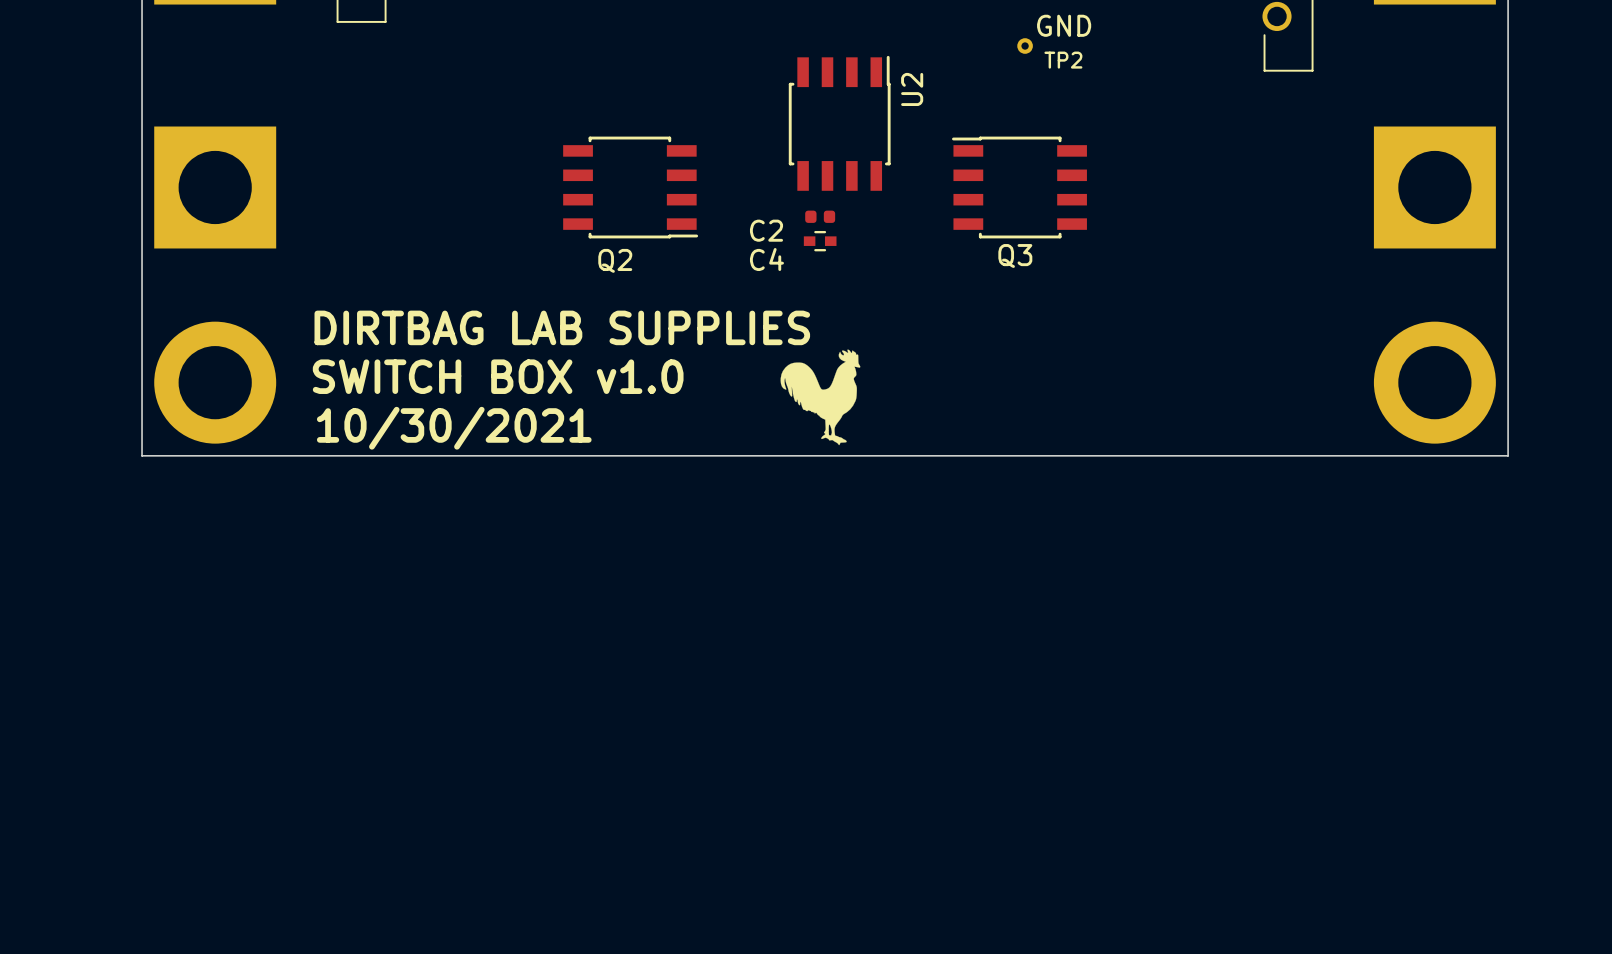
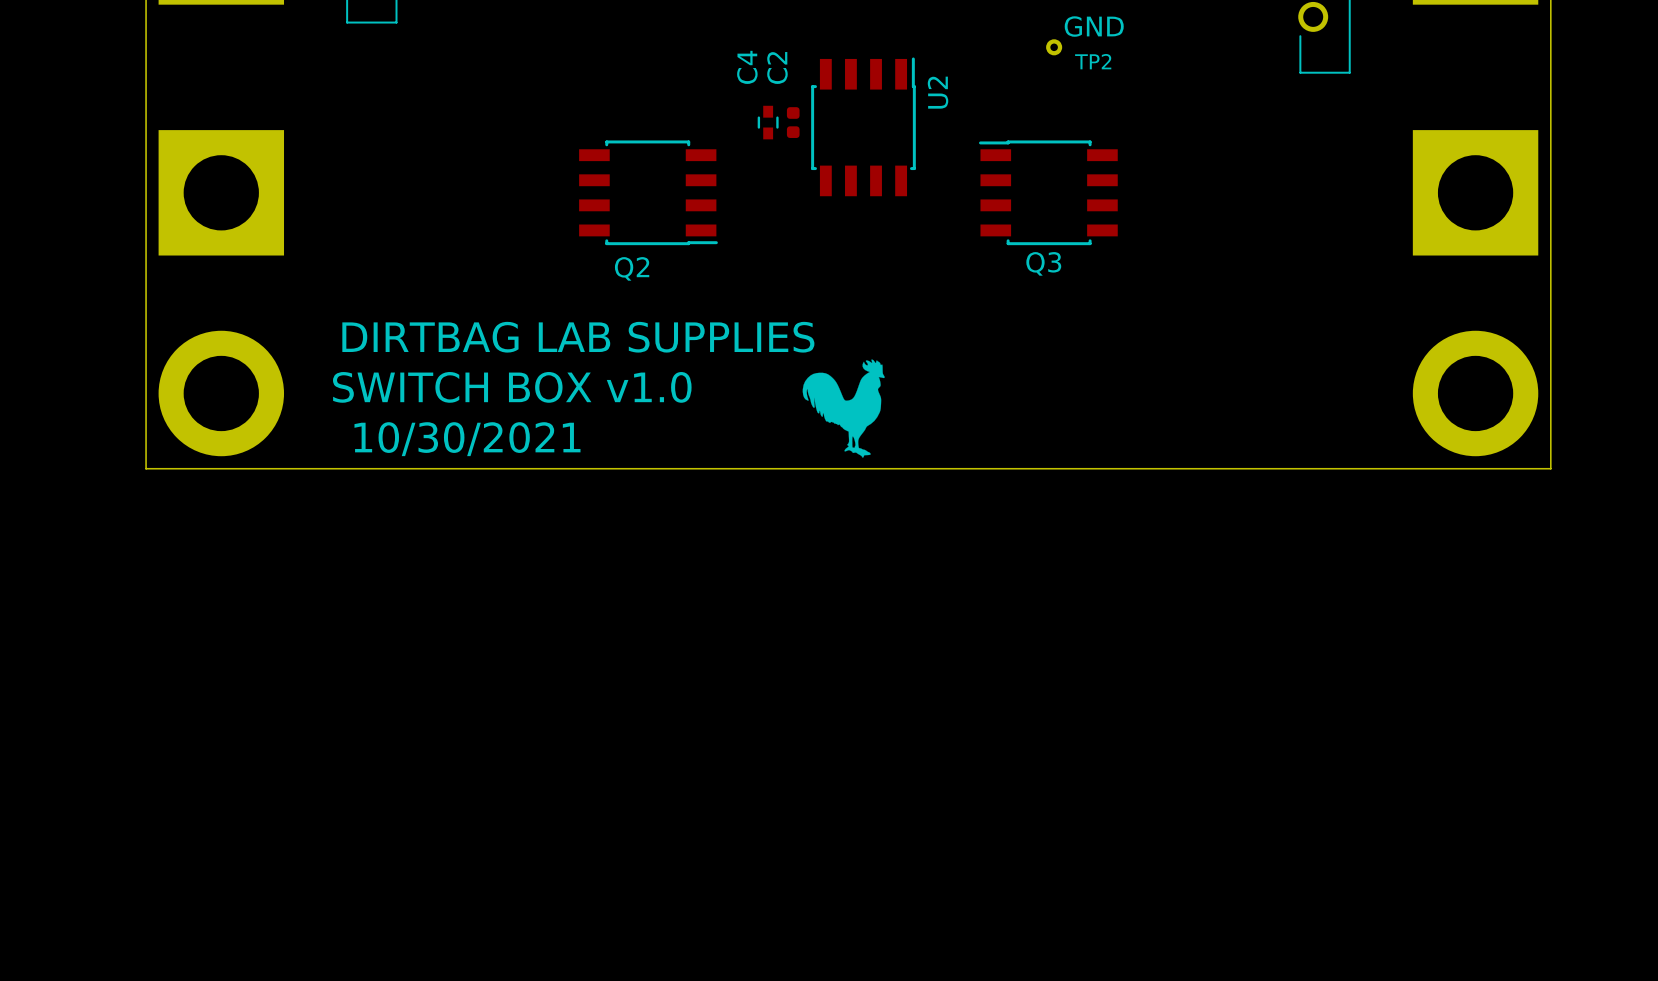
C2 rotation: 0° (820, 216) -> 90° clockwise (793, 122)
C2 position: (820, 216) -> (793, 122)
C4 rotation: 0° (820, 241) -> 90° clockwise (768, 122)
C4 position: (820, 241) -> (768, 122)

